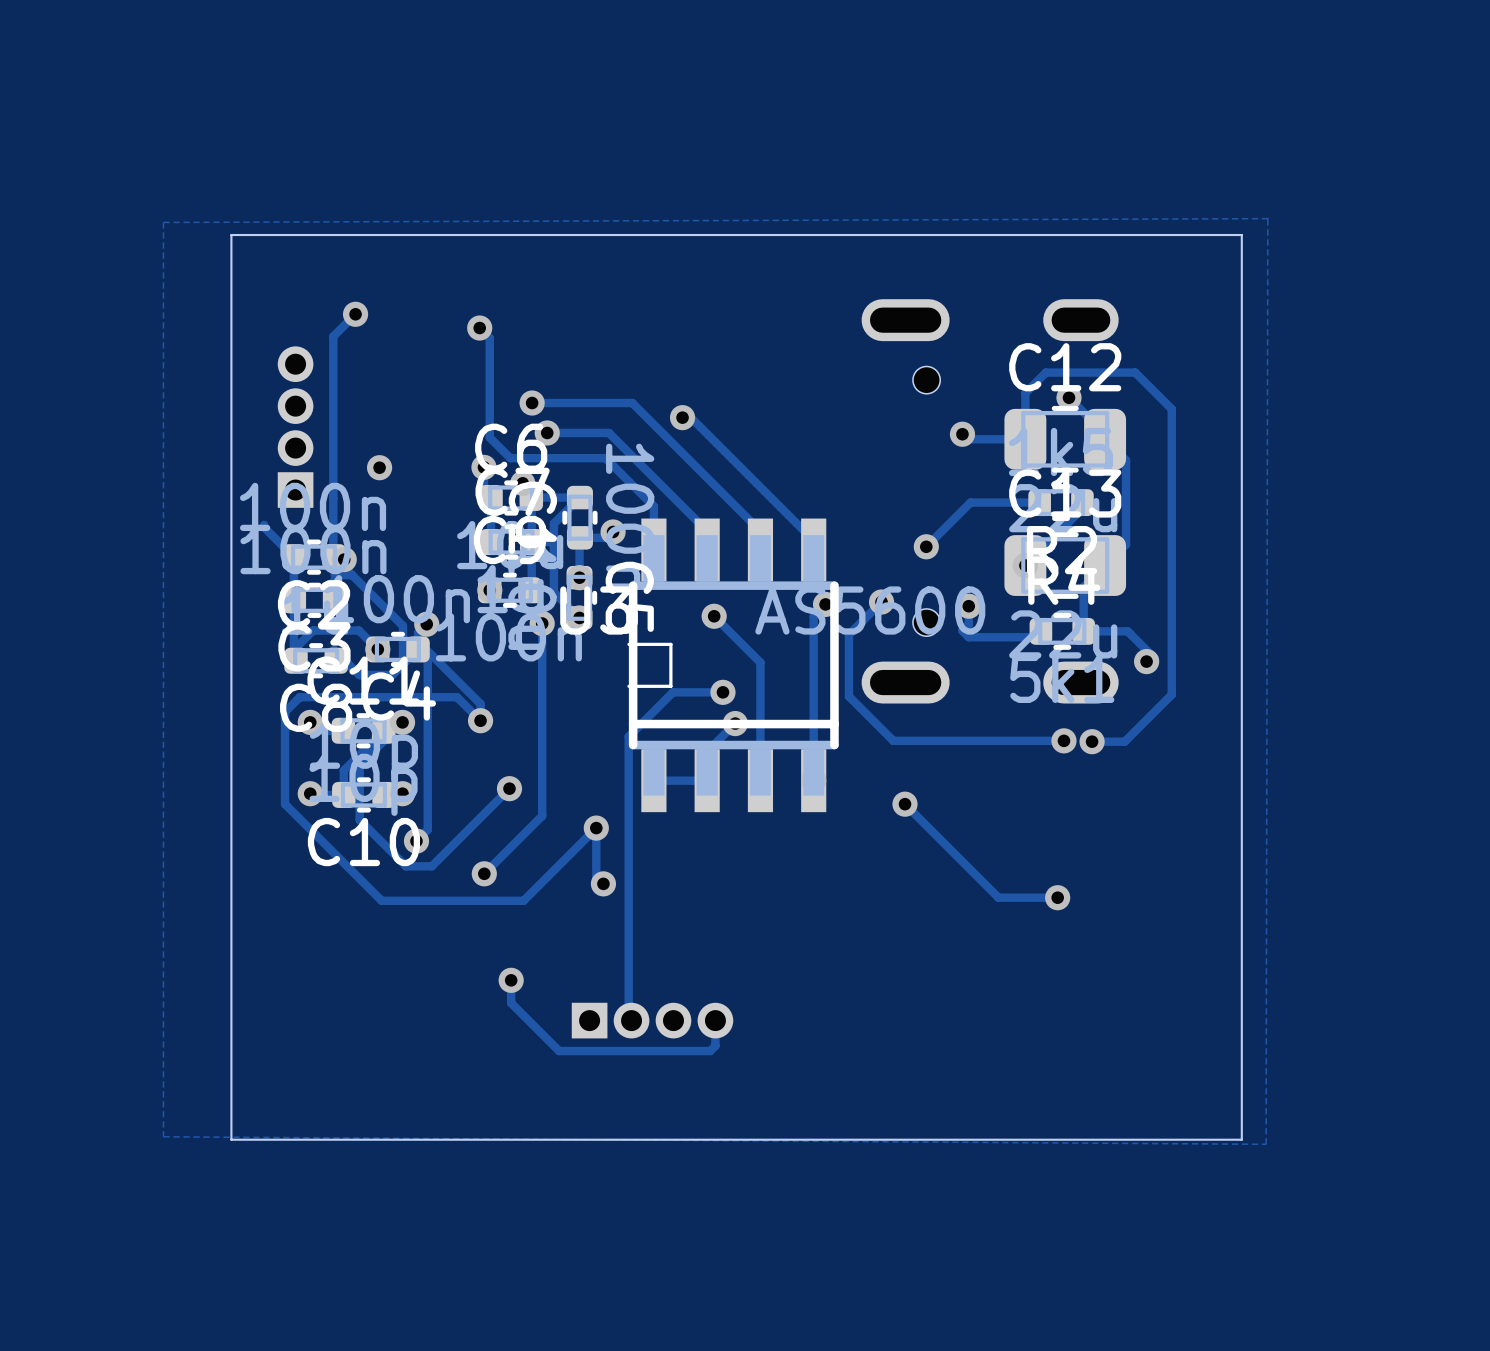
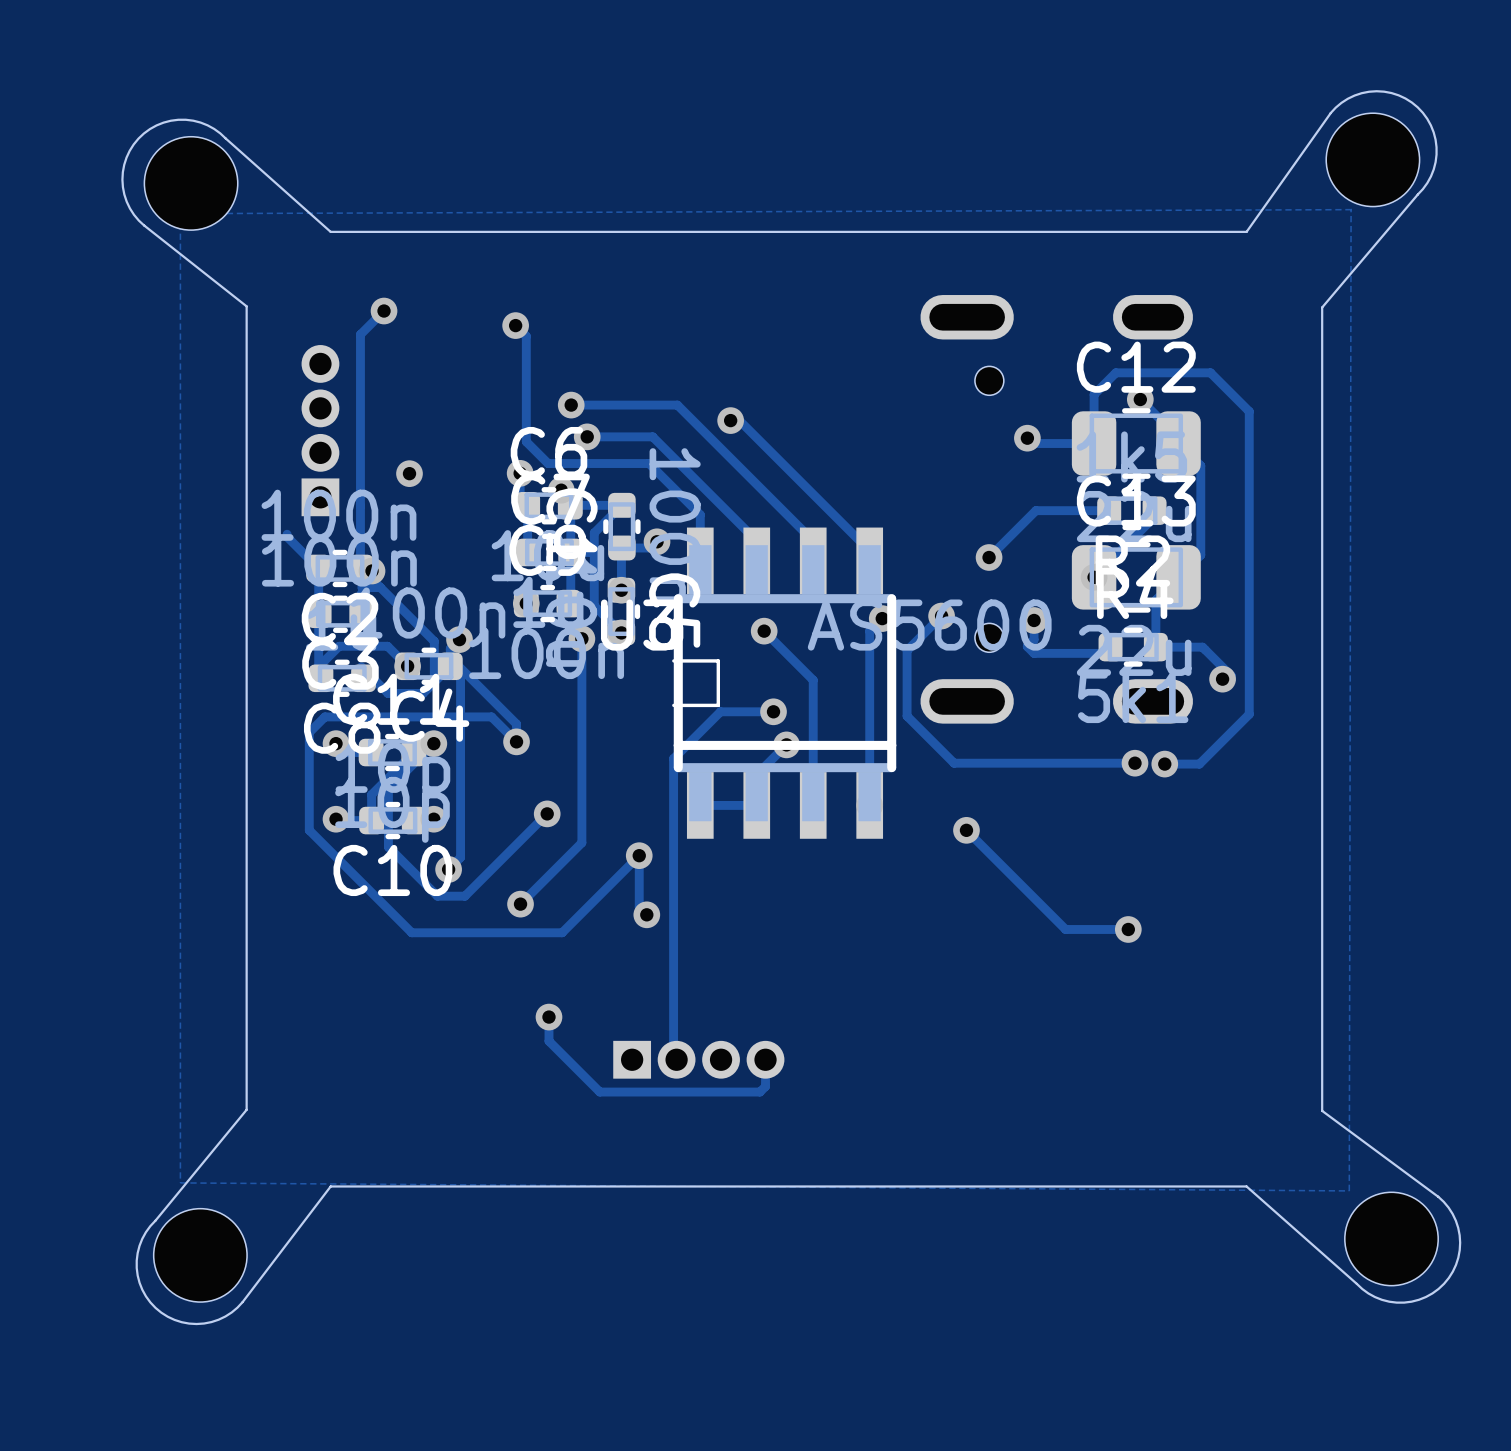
part: none -> (1372, 159)
part: none -> (191, 183)
board edge: (1241, 235) (231, 235) (231, 1139) (1241, 1139) (1241, 235) -> (1330, 113) (1246, 231) (330, 231) (220, 133) (207, 125) (193, 120) (170, 120) (156, 125) (138, 138) (126, 157) (122, 172) (124, 194) (134, 214) (144, 225) (246, 306) (246, 1109) (150, 1226) (142, 1238) (136, 1260) (137, 1275) (145, 1296) (155, 1307) (174, 1319) (196, 1324) (218, 1319) (231, 1312) (242, 1302) (330, 1186) (1246, 1186) (1362, 1289) (1374, 1297) (1389, 1301) (1411, 1301) (1425, 1296) (1444, 1283) (1456, 1264) (1460, 1242) (1455, 1220) (1448, 1207) (1438, 1196) (1322, 1110) (1322, 307) (1422, 189) (1433, 169) (1436, 154) (1435, 139) (1427, 118) (1417, 107) (1398, 95) (1376, 91) (1361, 93) (1347, 98) (1330, 113)
part: none -> (1391, 1238)
part: none -> (200, 1255)

